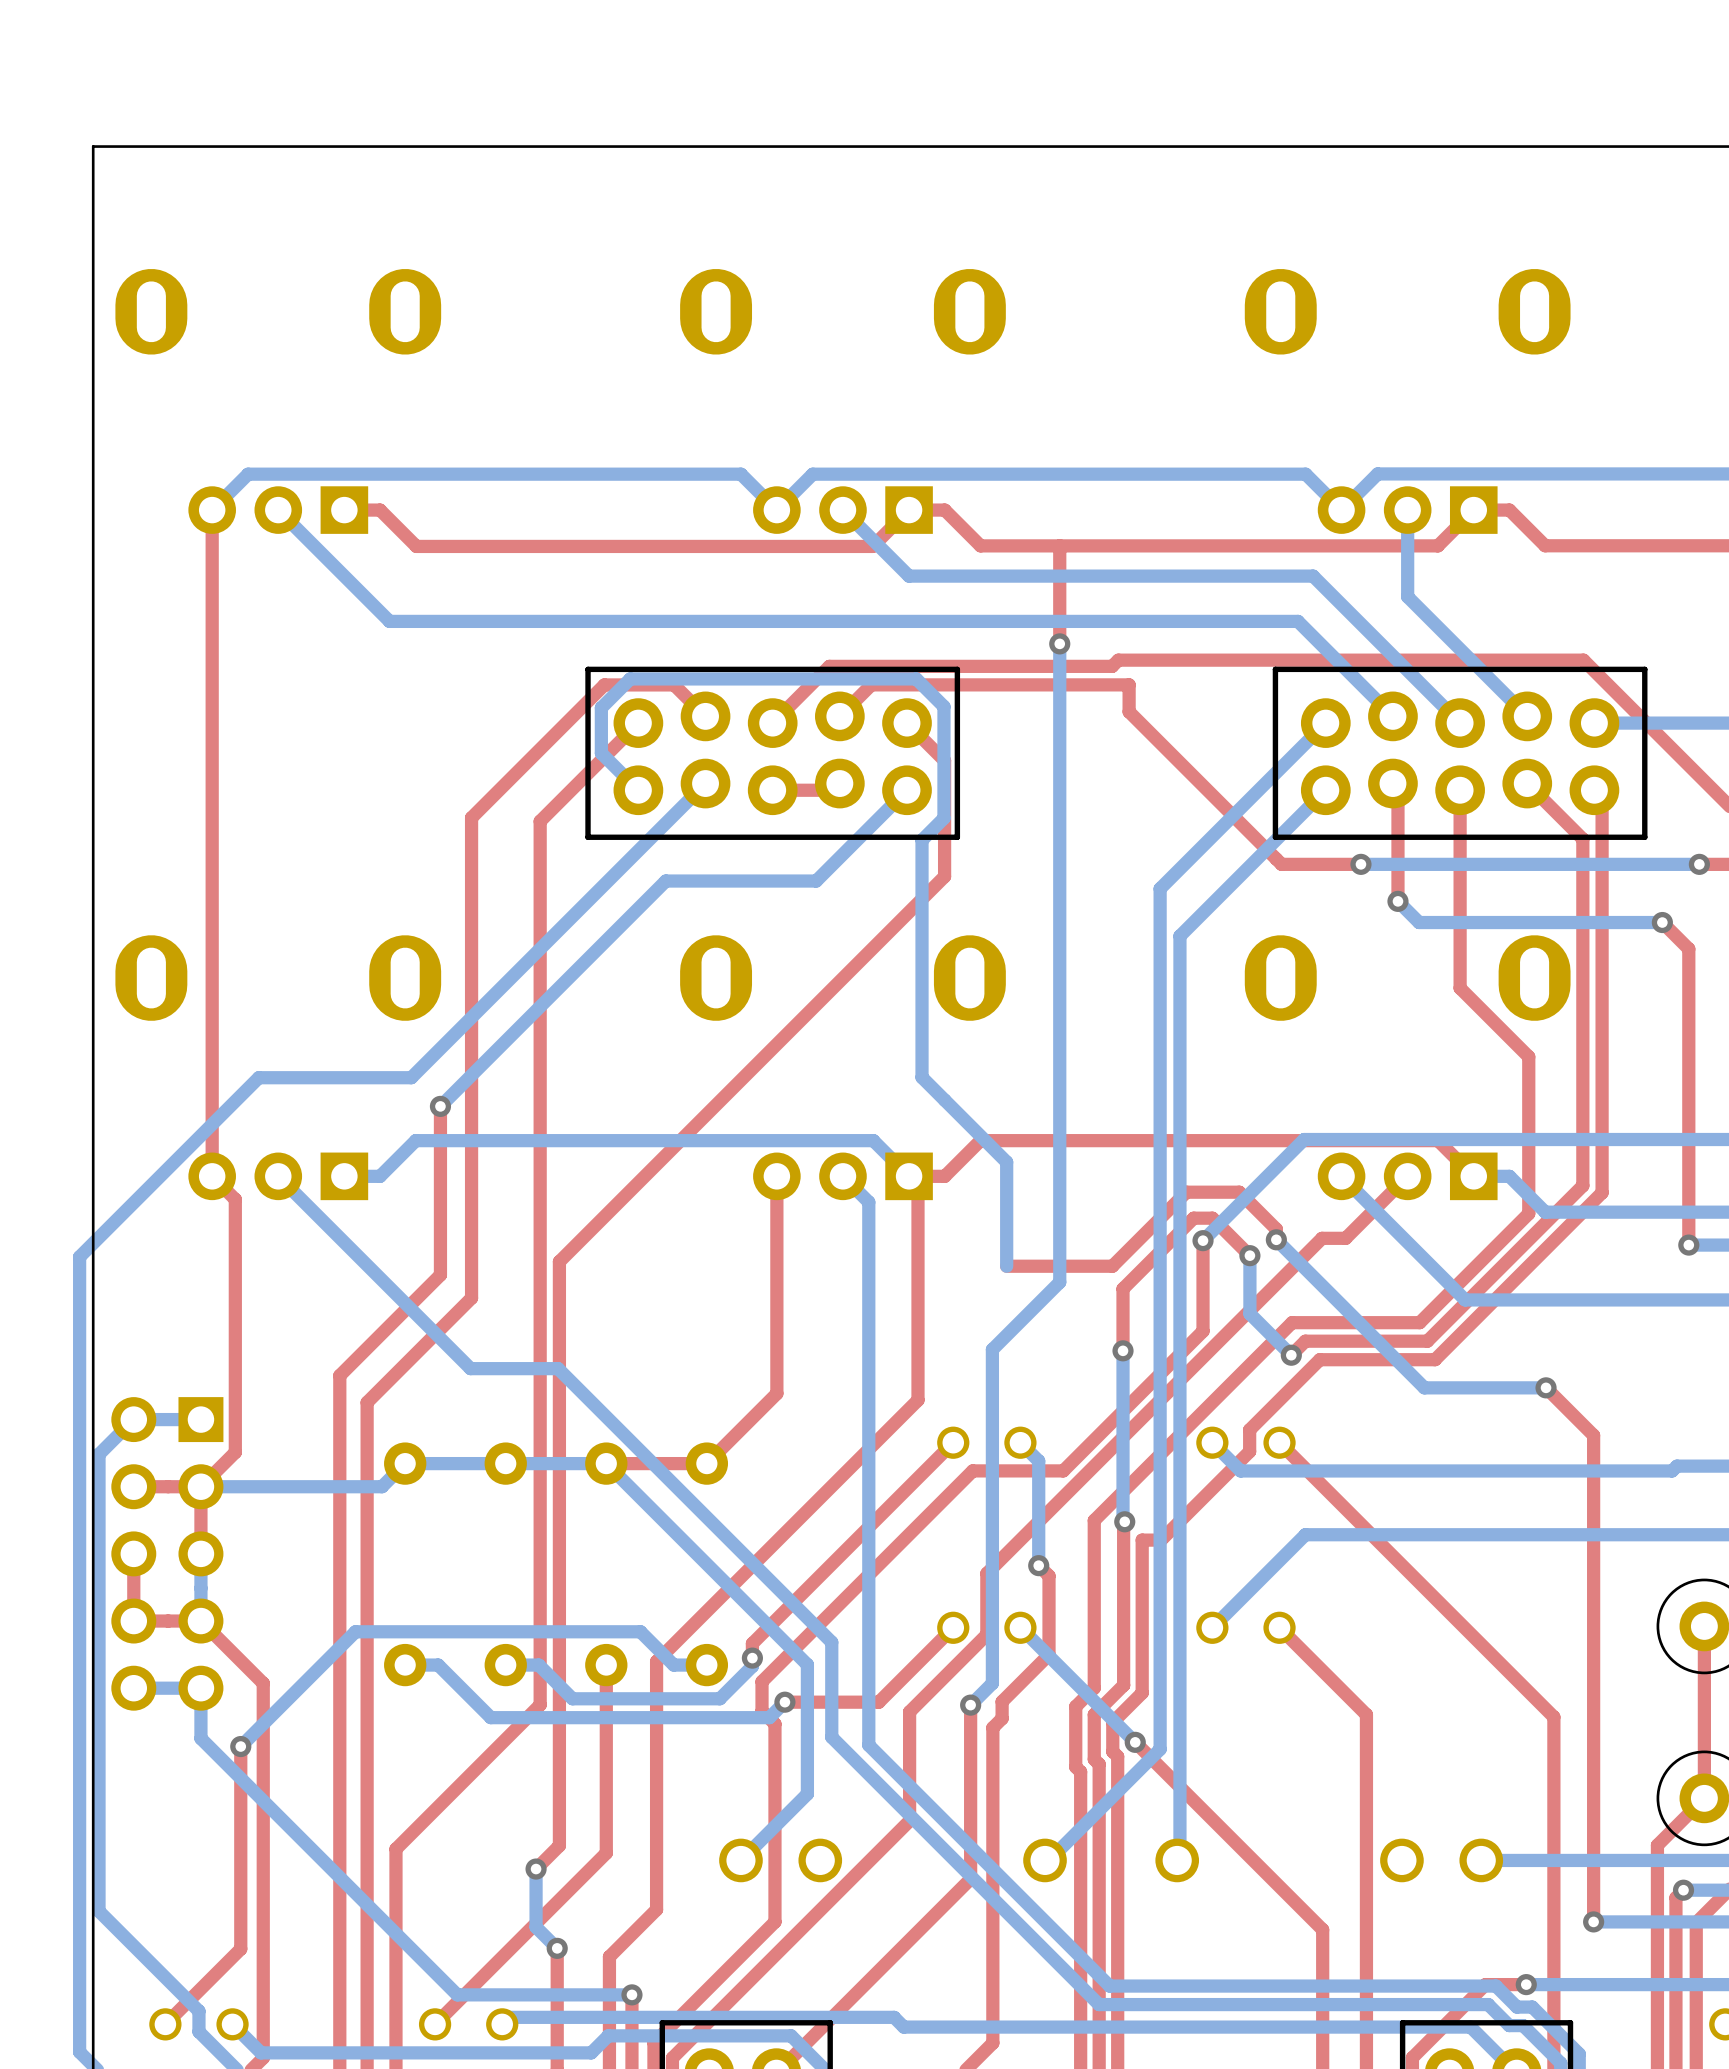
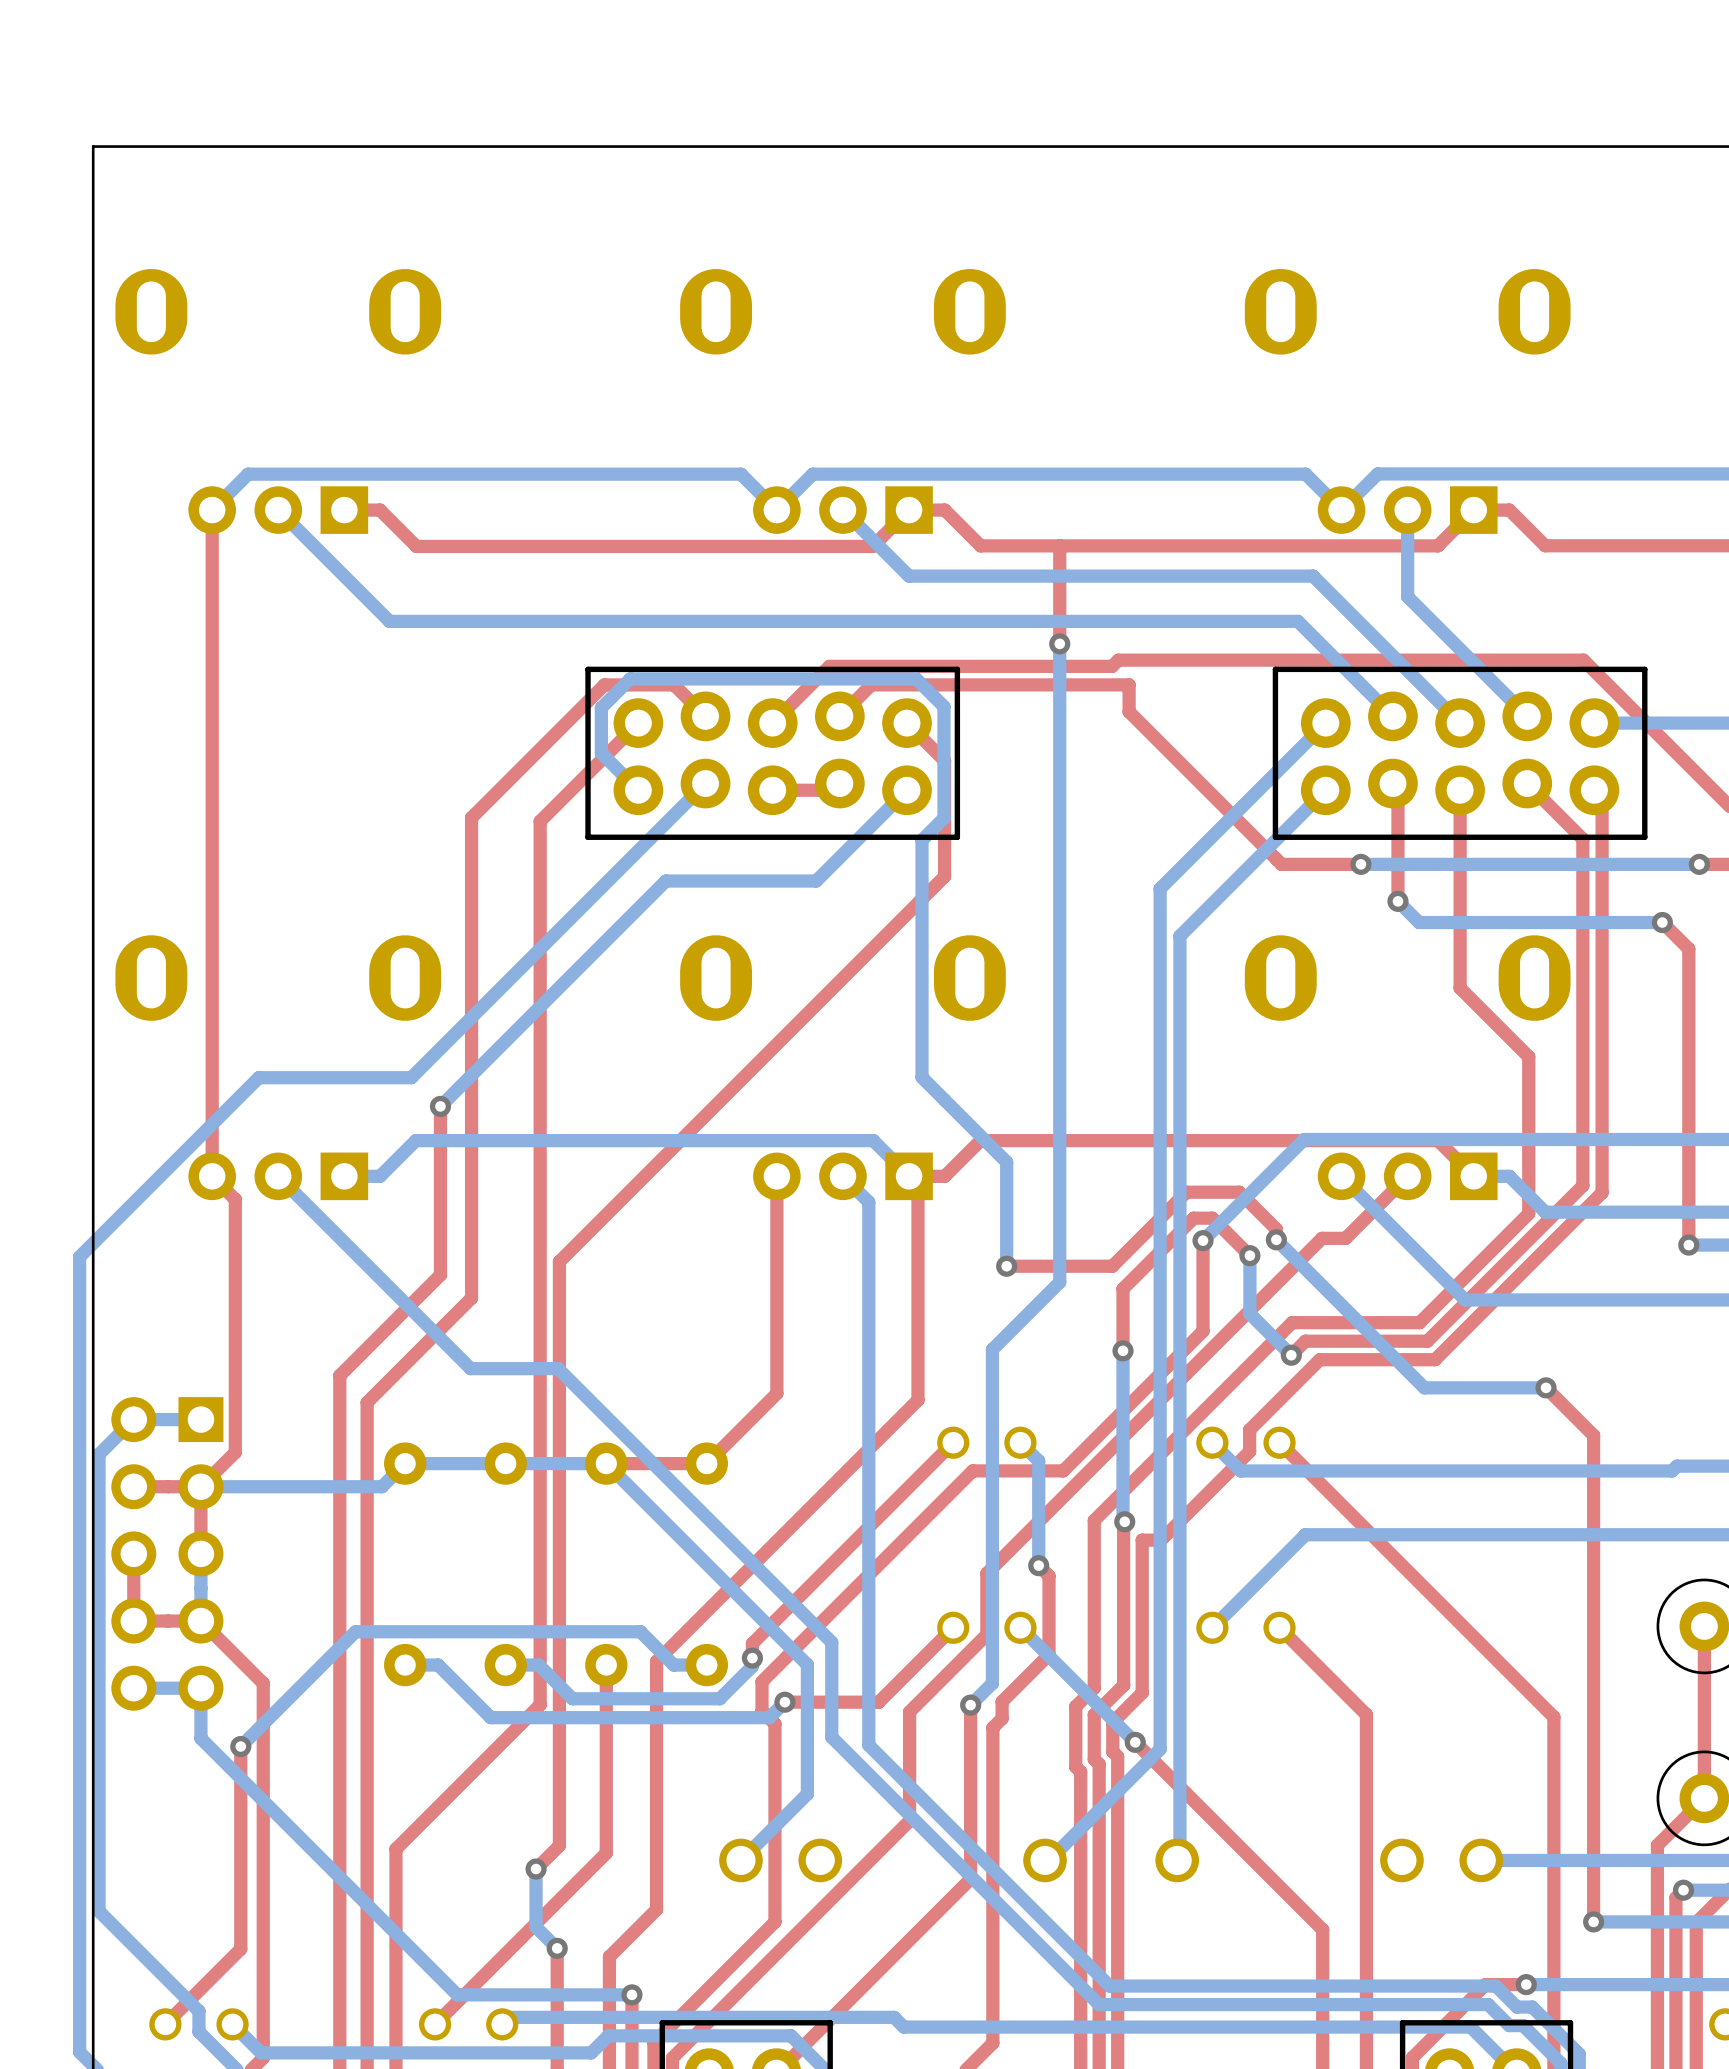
via: none -> (1006, 1266)

